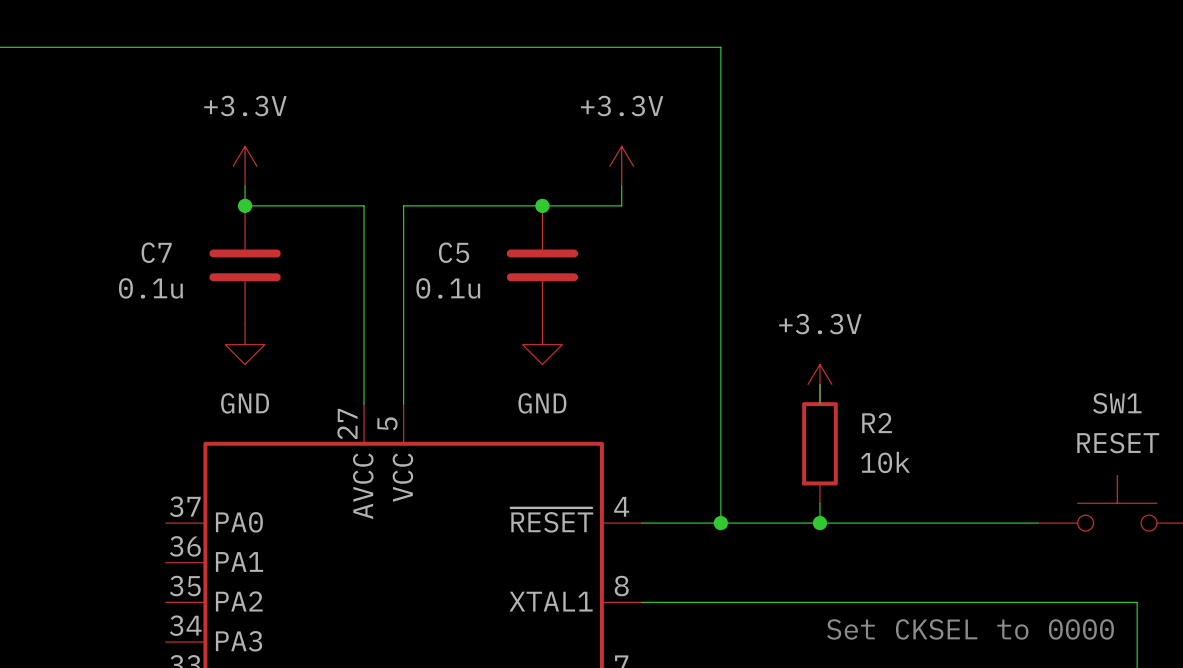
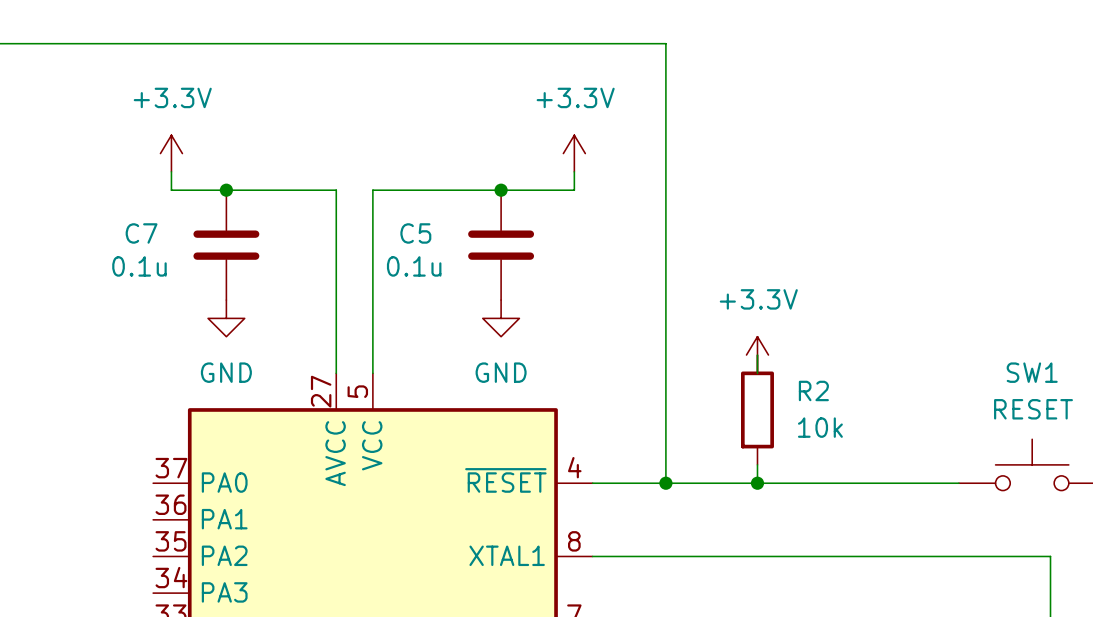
power symbol position: +3.3V (245, 166) -> +3.3V (171, 153)
wire: (245, 186) (245, 205) -> (171, 171) (171, 190) (226, 190)
text: Set CKSEL to 0000 (970, 629) -> none

